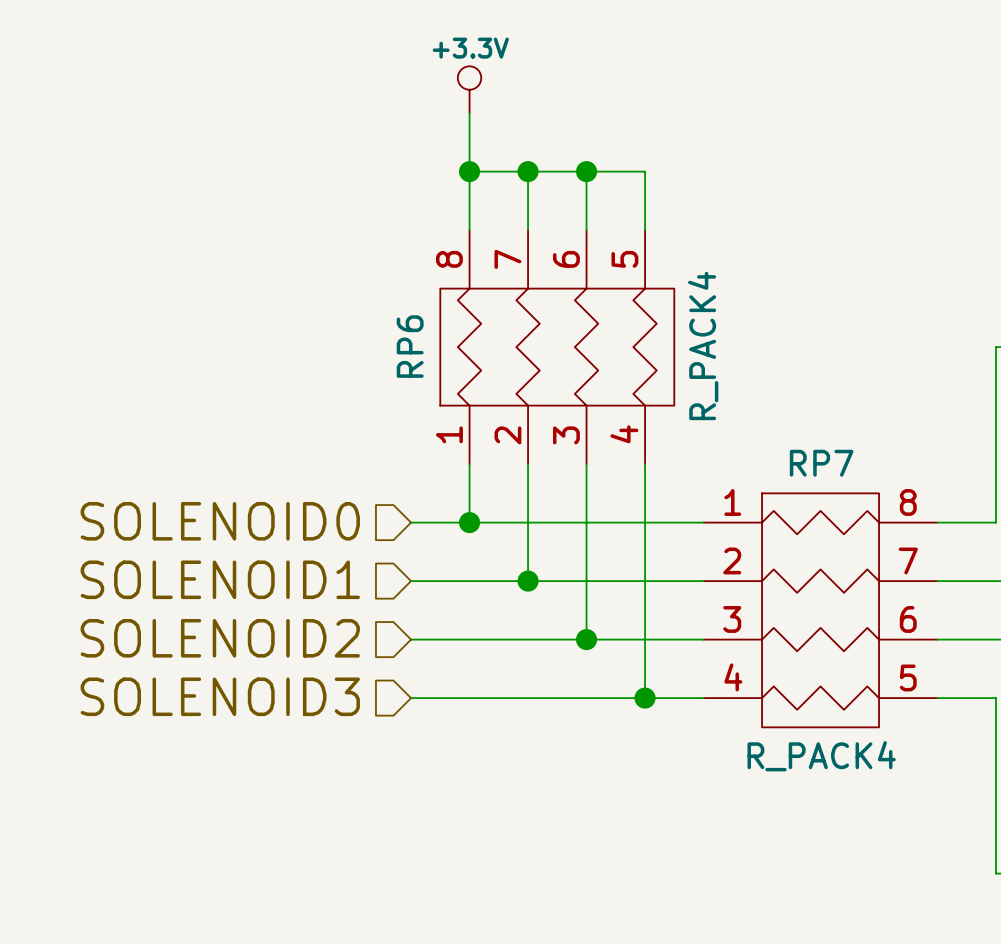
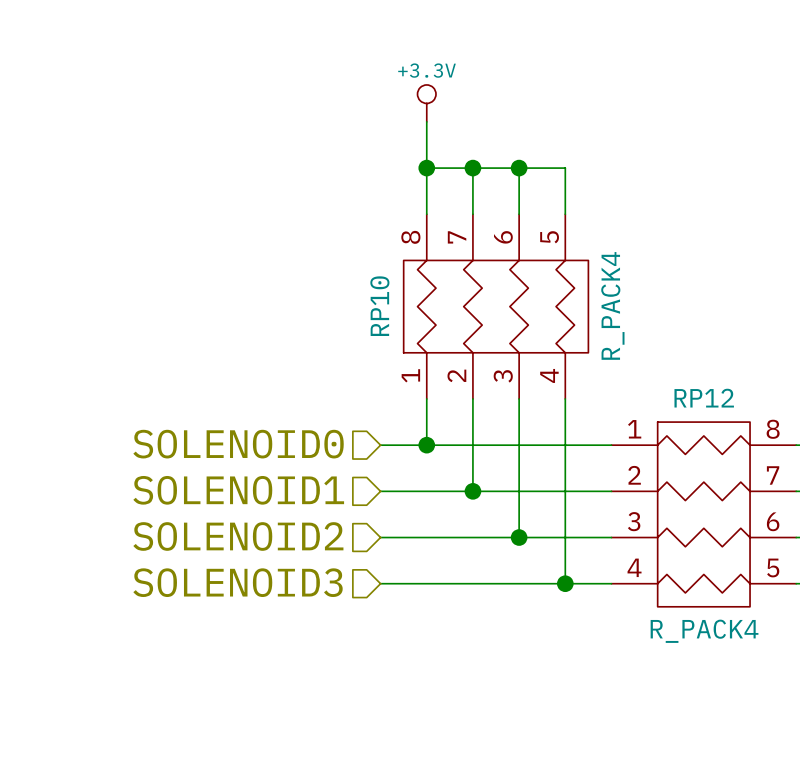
RP6 name: RP6 (410, 346) -> RP10 (379, 306)
RP7 name: RP7 (821, 463) -> RP12 (704, 398)

